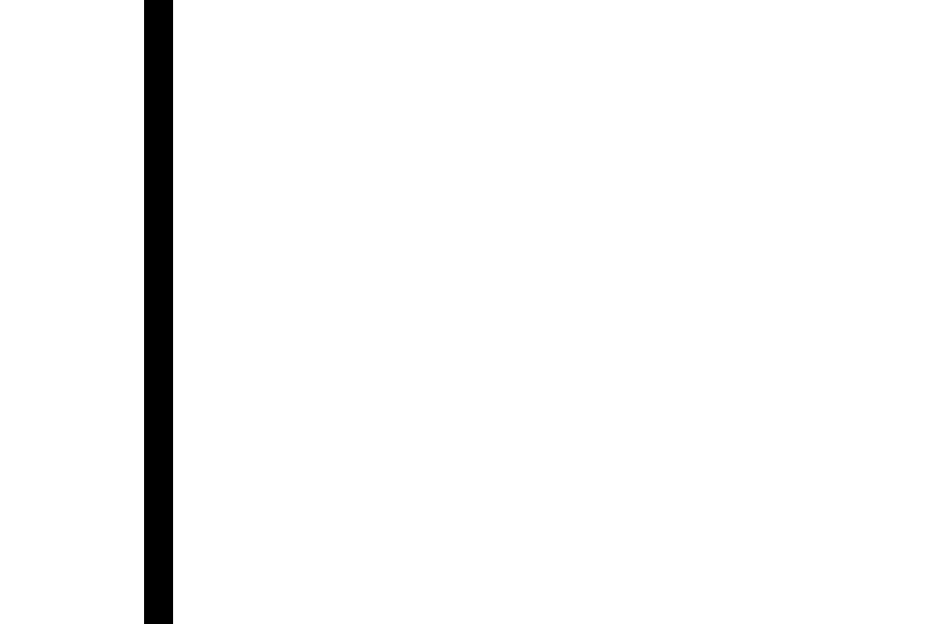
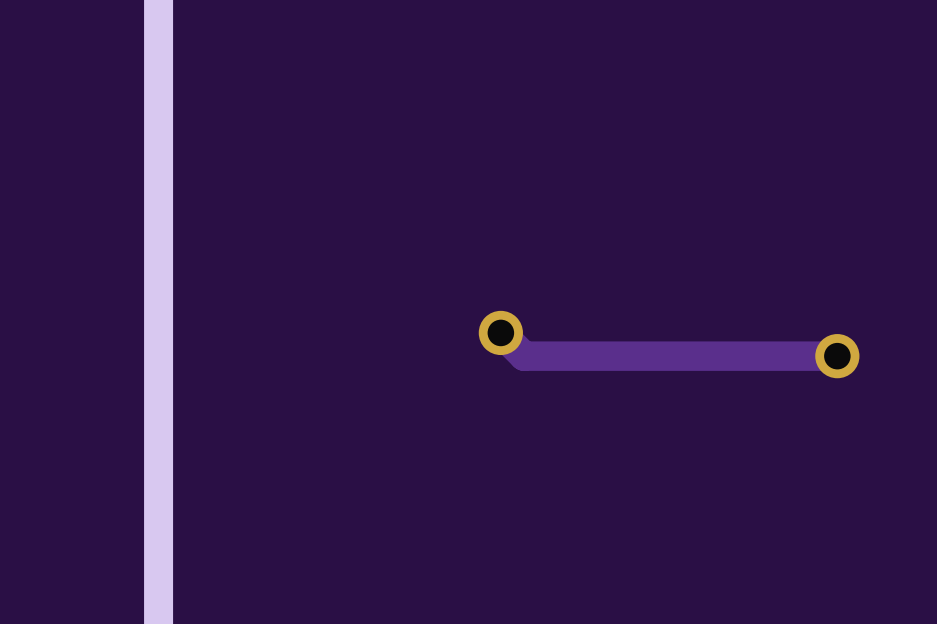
track: none -> (500, 332) (524, 356) (837, 356)
via: none -> (500, 332)
via: none -> (837, 356)

